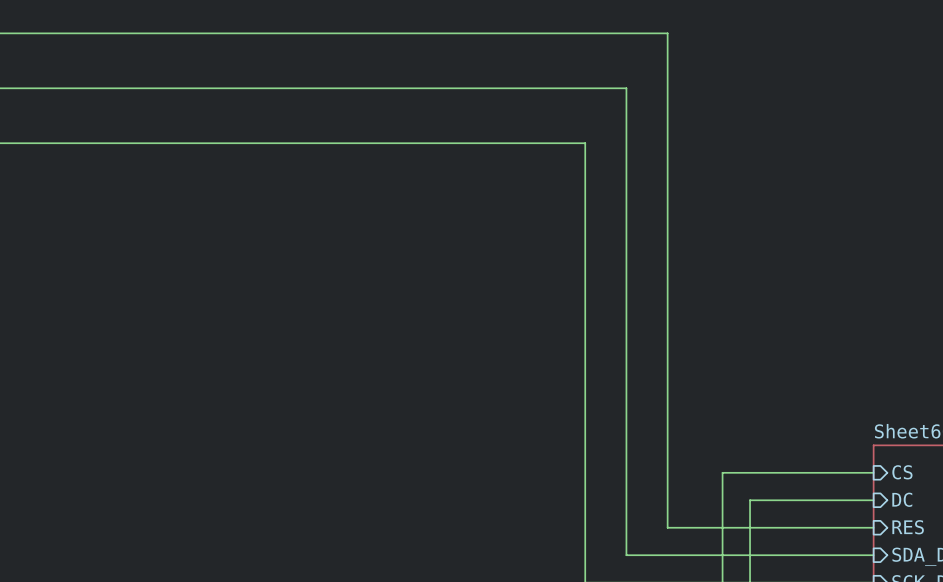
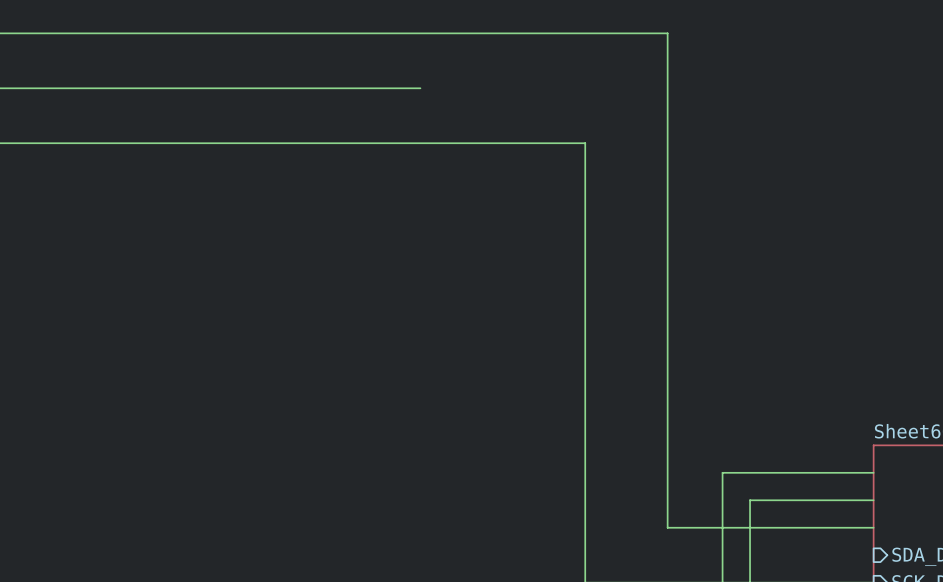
wire: (420, 88) (626, 88) (626, 555) (873, 555) -> none
sheet pin: CS (902, 472) -> none
sheet pin: DC (902, 499) -> none
sheet pin: RES (908, 527) -> none

